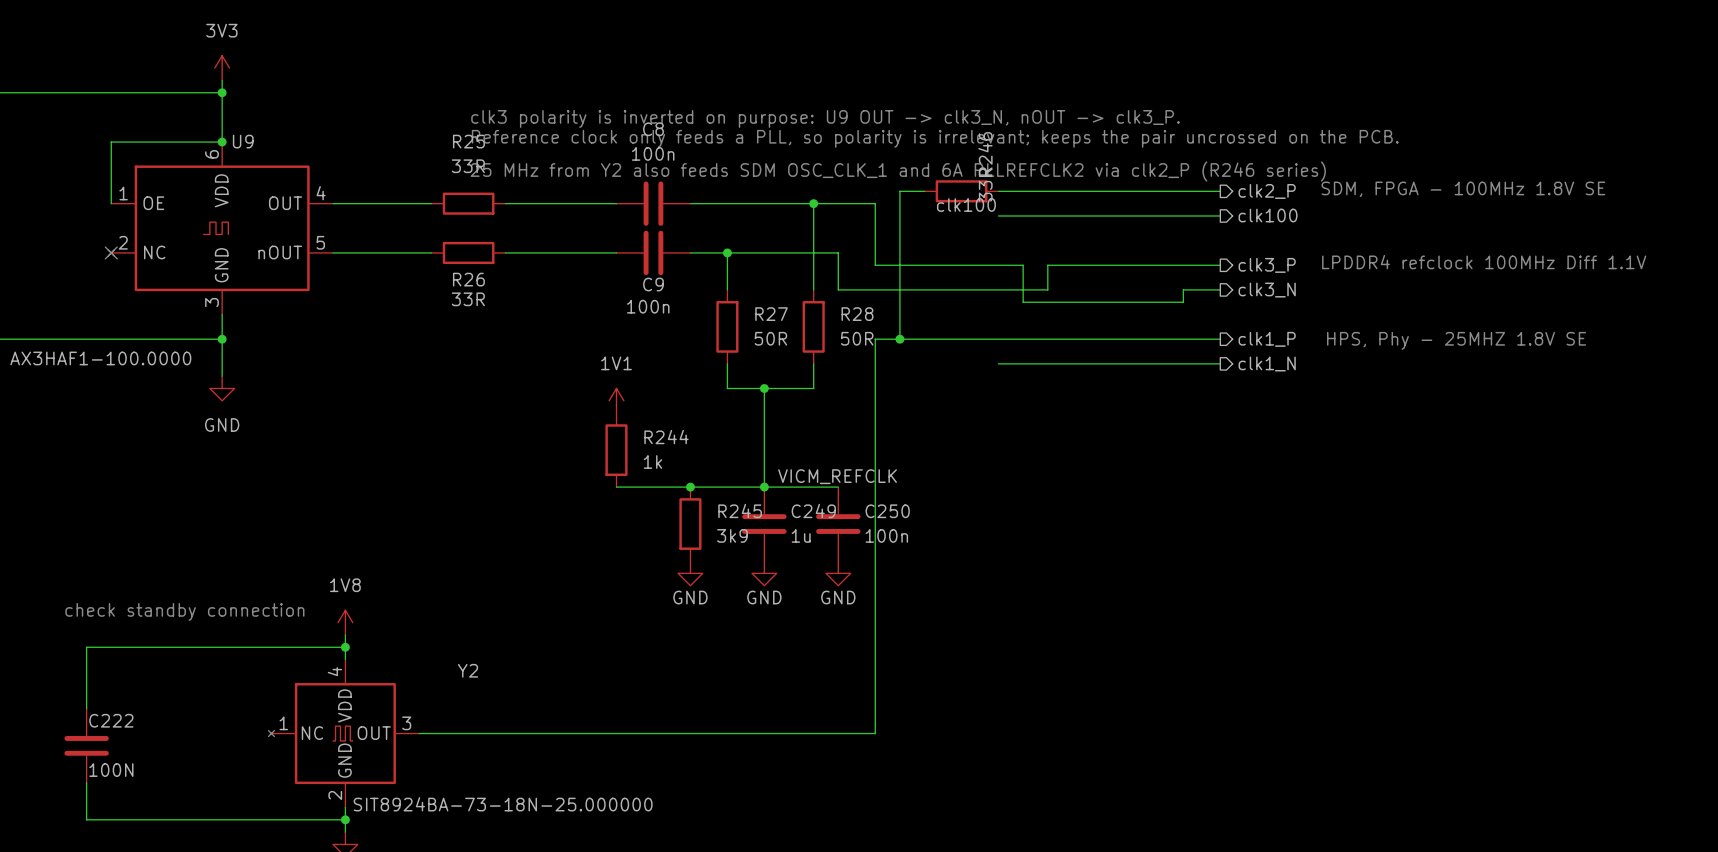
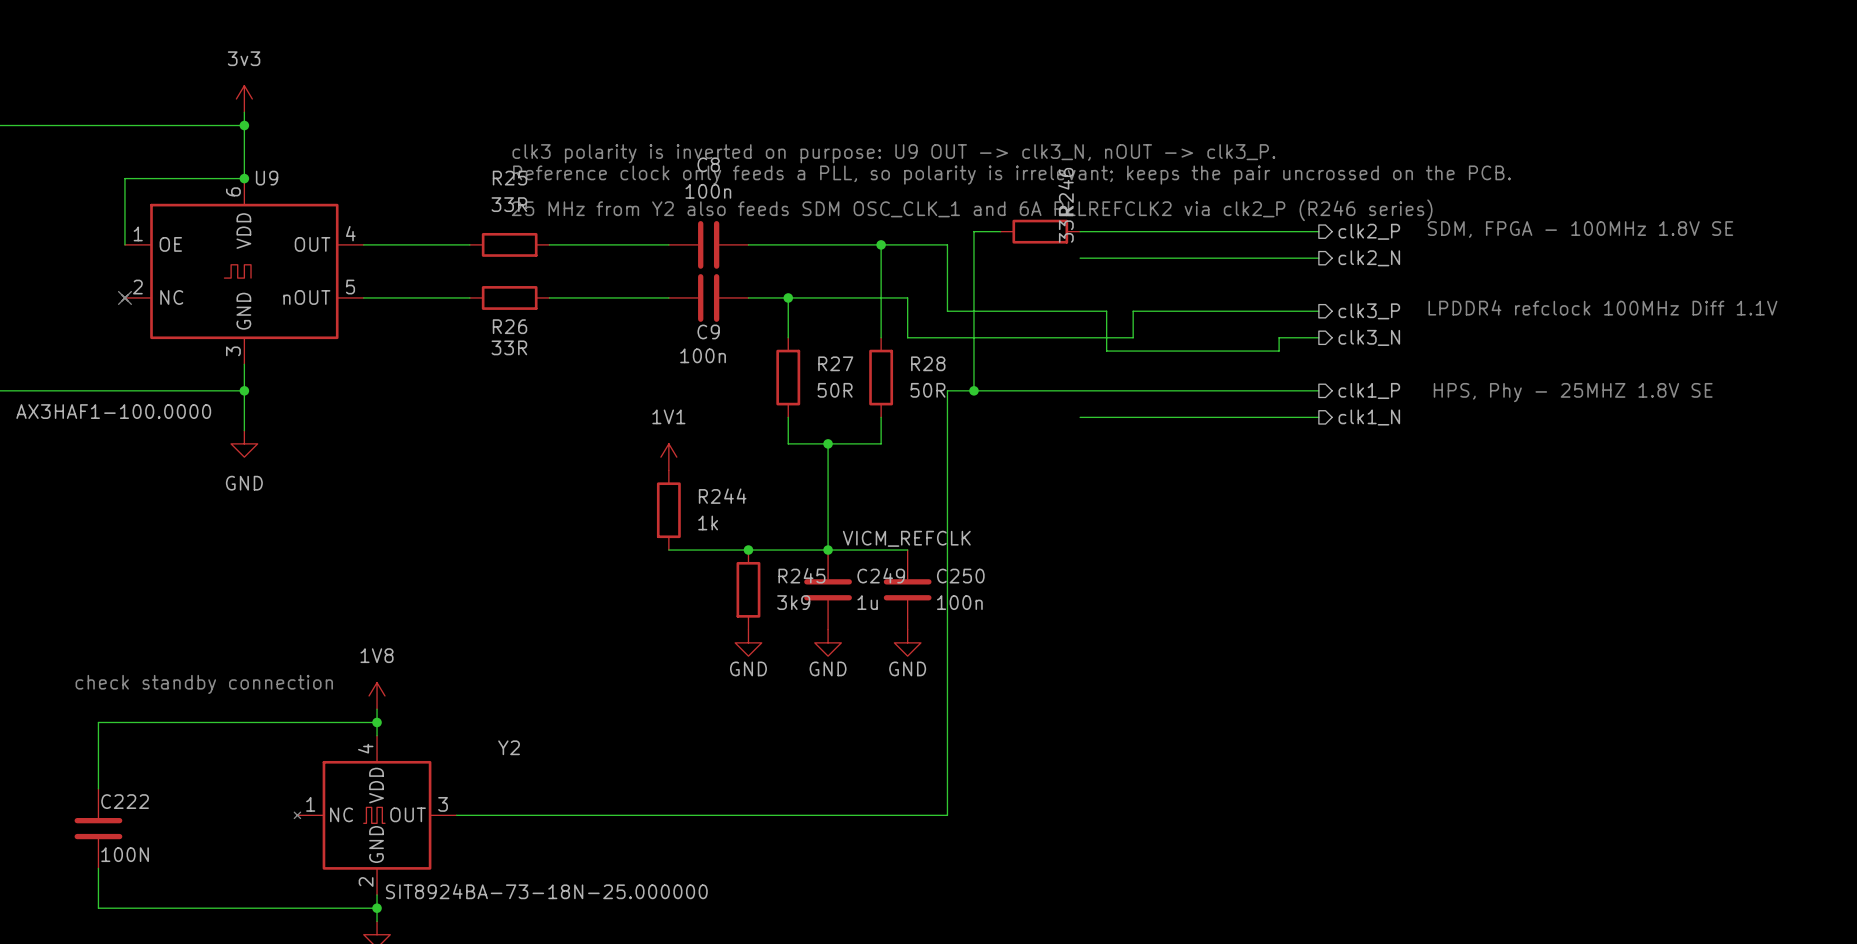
power symbol: 3V3 (222, 68) -> 3v3 (244, 98)
label: clk100 (966, 204) -> none
hierarchical label: clk100 (1268, 215) -> clk2_N (1369, 258)

